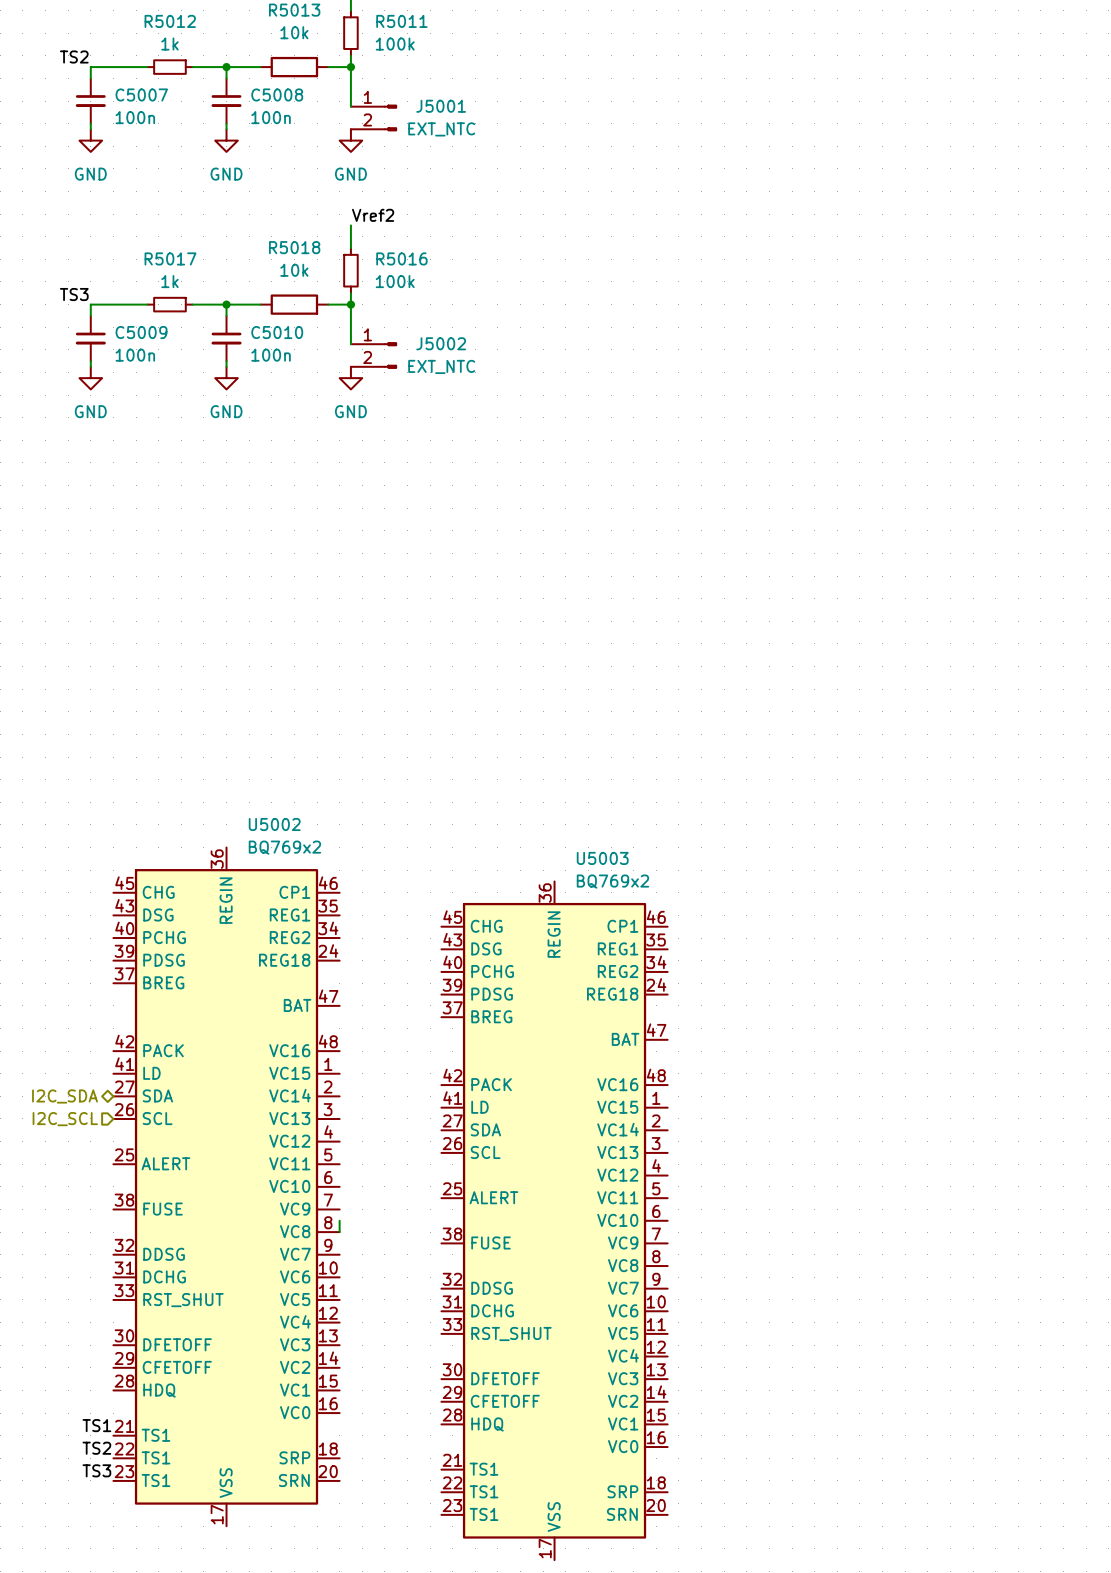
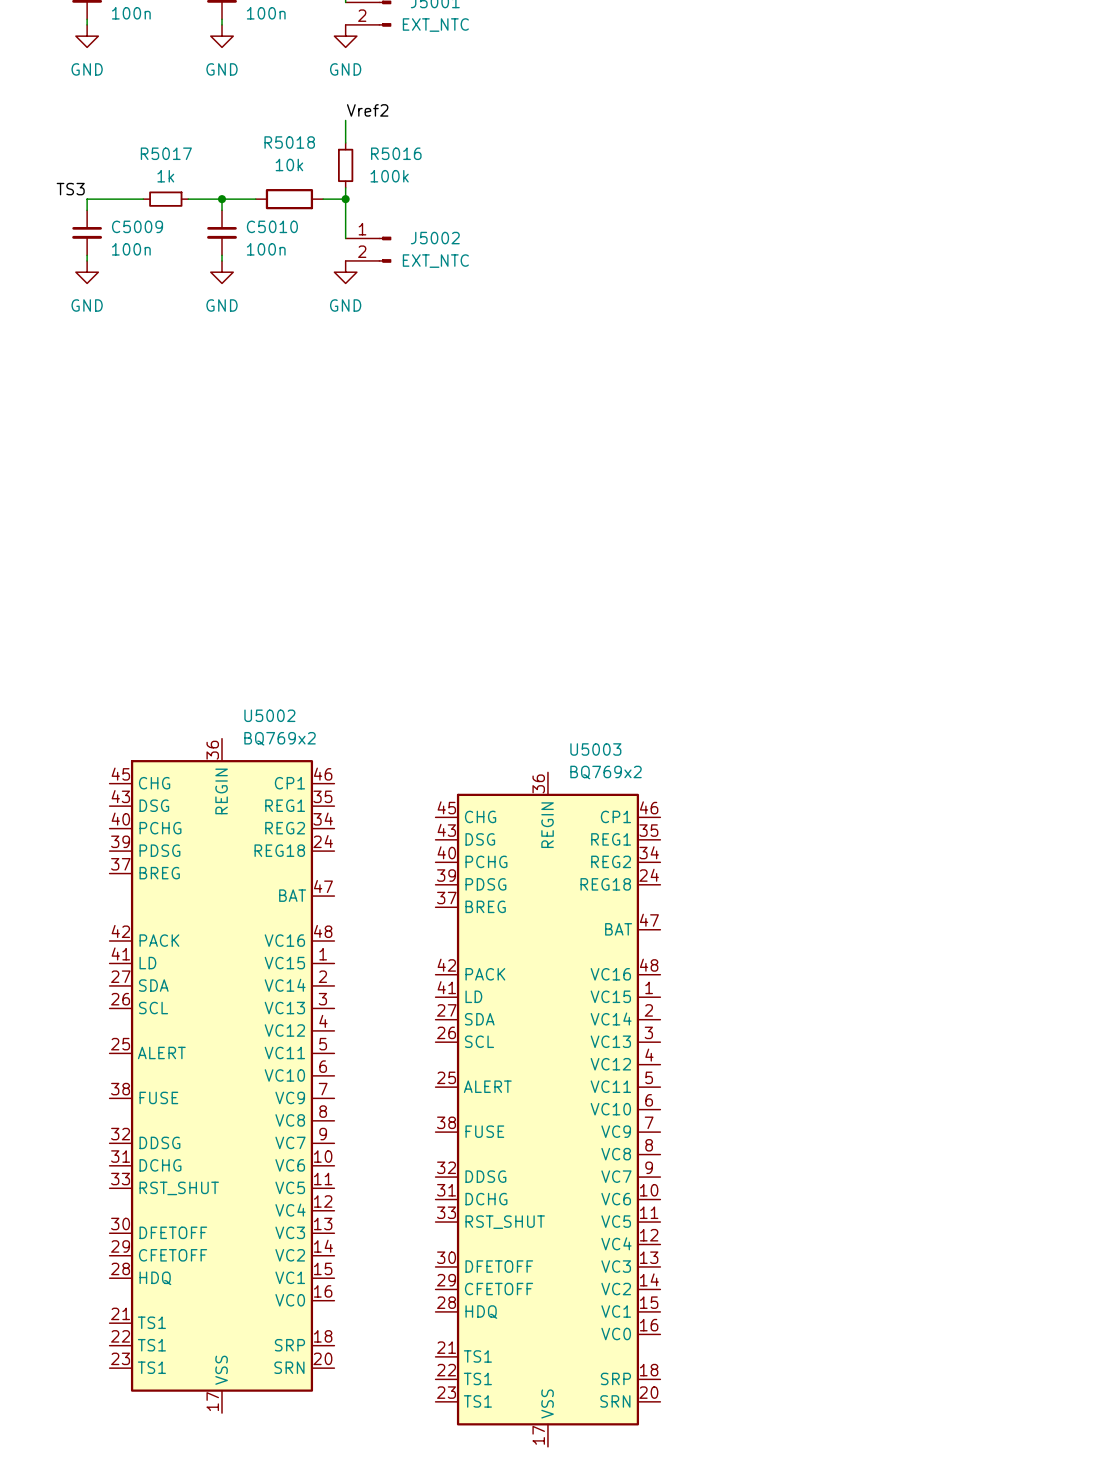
hierarchical label: I2C_SDA (65, 1096) -> none
hierarchical label: I2C_SCL (65, 1119) -> none
wire: (339, 1220) (339, 1232) -> none
label: TS1 (96, 1425) -> none
label: TS2 (96, 1448) -> none
label: TS3 (96, 1470) -> none

